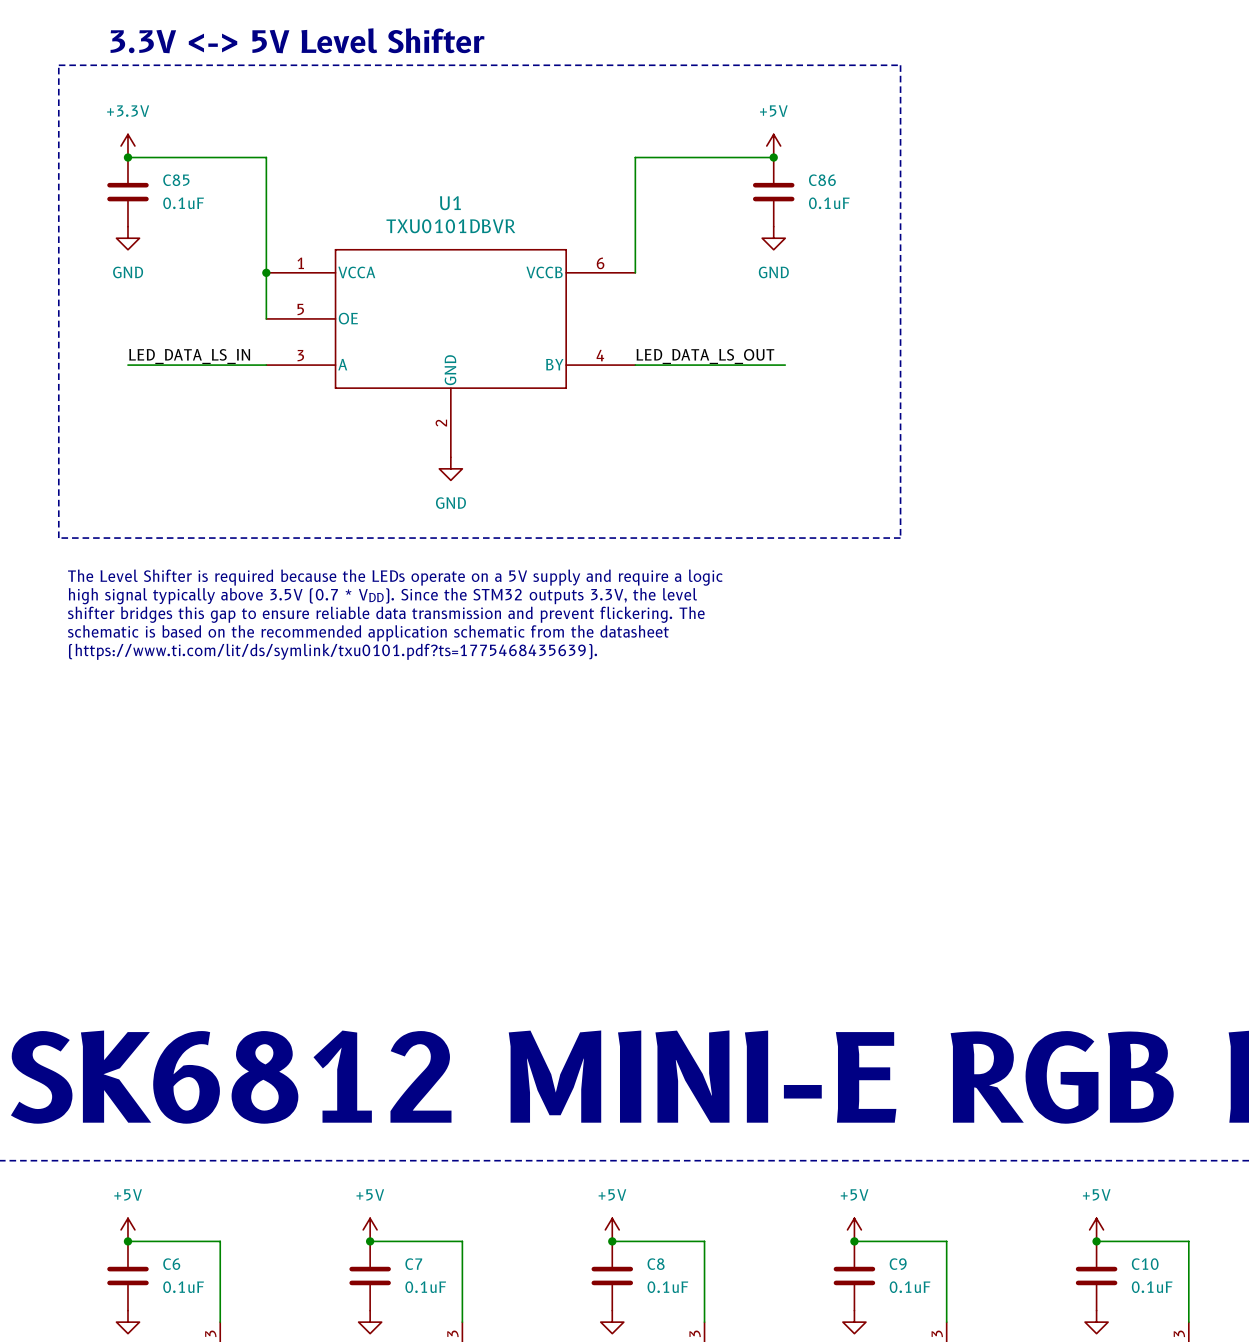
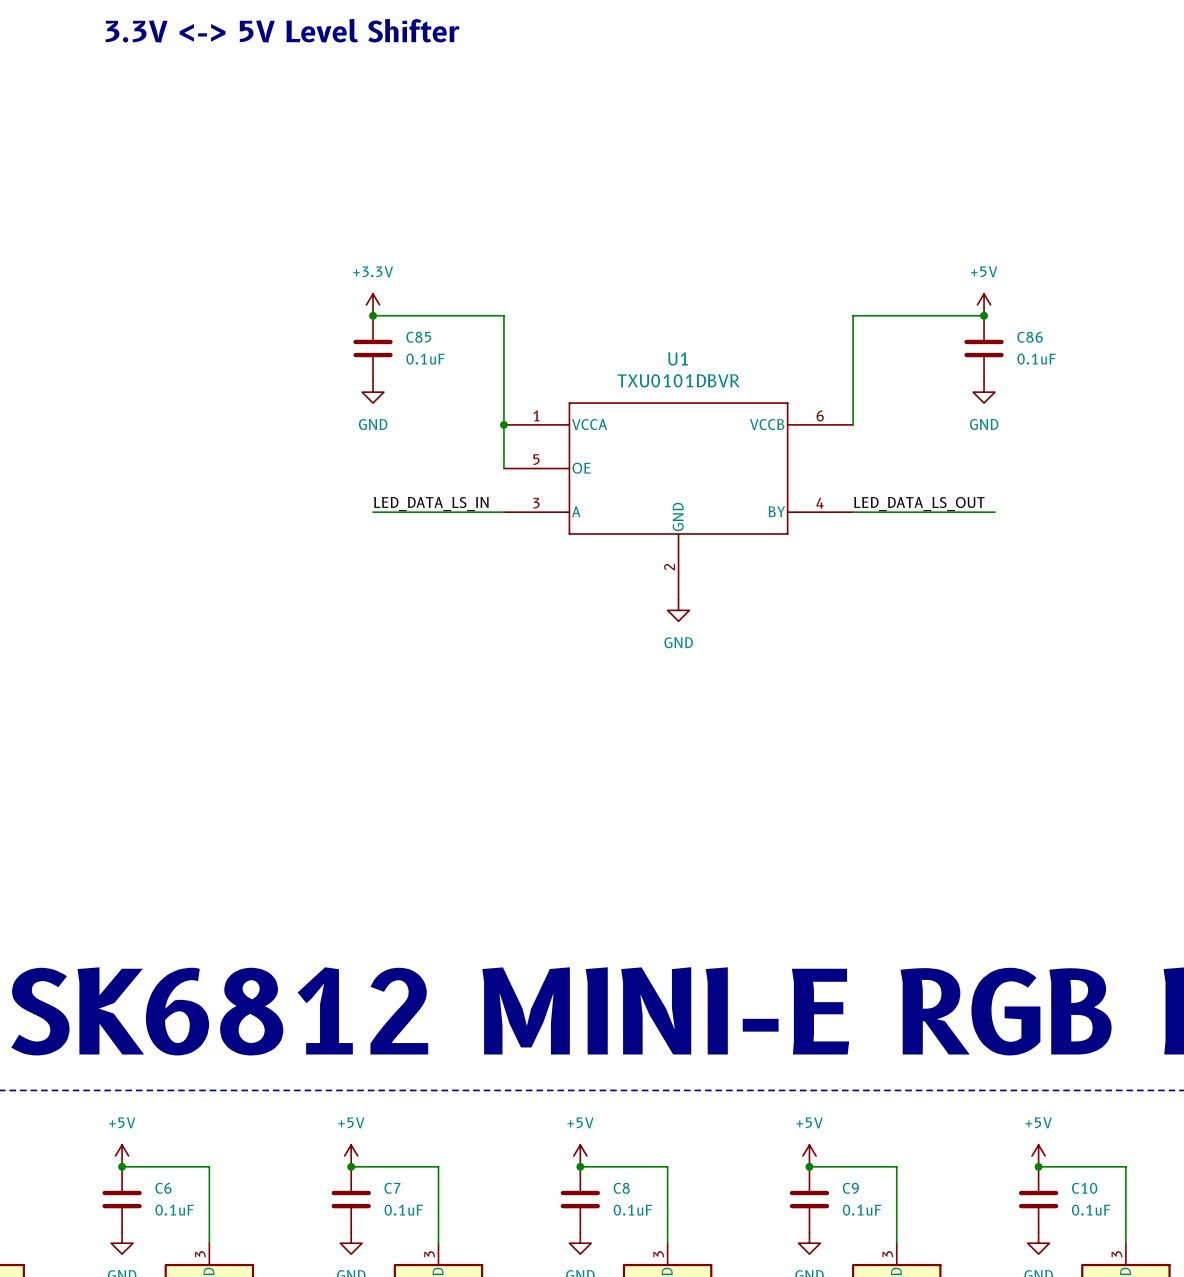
line: (58, 65) (900, 65) (900, 538) (58, 538) (58, 65) -> none
power symbol: +3.3V (127, 145) -> none
power symbol: +5V (773, 145) -> none
wire: (127, 157) (266, 157) (266, 318) -> none
junction: (127, 157) -> none
wire: (773, 157) (635, 157) (635, 272) -> none
junction: (773, 157) -> none
C85 position: (127, 192) -> (373, 348)
C86 position: (773, 192) -> (984, 348)
power symbol: GND (127, 238) -> none
power symbol: GND (773, 238) -> none
junction: (266, 272) -> none
power symbol: none -> +3.3V (373, 304)
power symbol: none -> +5V (984, 304)
wire: none -> (373, 315) (503, 315) (503, 468)
junction: none -> (373, 315)
wire: none -> (984, 315) (853, 315) (853, 424)
junction: none -> (984, 315)
U1 position: (450, 353) -> (678, 500)
label: LED_DATA_LS_IN (189, 356) -> none
label: LED_DATA_LS_OUT (705, 356) -> none
wire: (127, 365) (266, 365) -> none
wire: (635, 365) (785, 365) -> none
power symbol: none -> GND (984, 392)
junction: none -> (503, 424)
power symbol position: GND (450, 468) -> GND (373, 392)
label: none -> LED_DATA_LS_IN (431, 504)
label: none -> LED_DATA_LS_OUT (919, 504)
wire: none -> (373, 512) (503, 512)
wire: none -> (853, 512) (994, 512)
text: The Level Shifter is required because the LEDs operate on a 5V supply and require a logic (395, 577) -> none
text: high signal typically above 3.5V (0.7 * VDD). Since the STM32 outputs 3.3V, the level (382, 596) -> none
text: shifter bridges this gap to ensure reliable data transmission and prevent flickering. The (386, 614) -> none
text: schematic is based on the recommended application schematic from the datasheet (368, 633) -> none
text: (https://www.ti.com/lit/ds/symlink/txu0101.pdf?ts=1775468435639). (333, 651) -> none
power symbol: none -> GND (678, 610)

